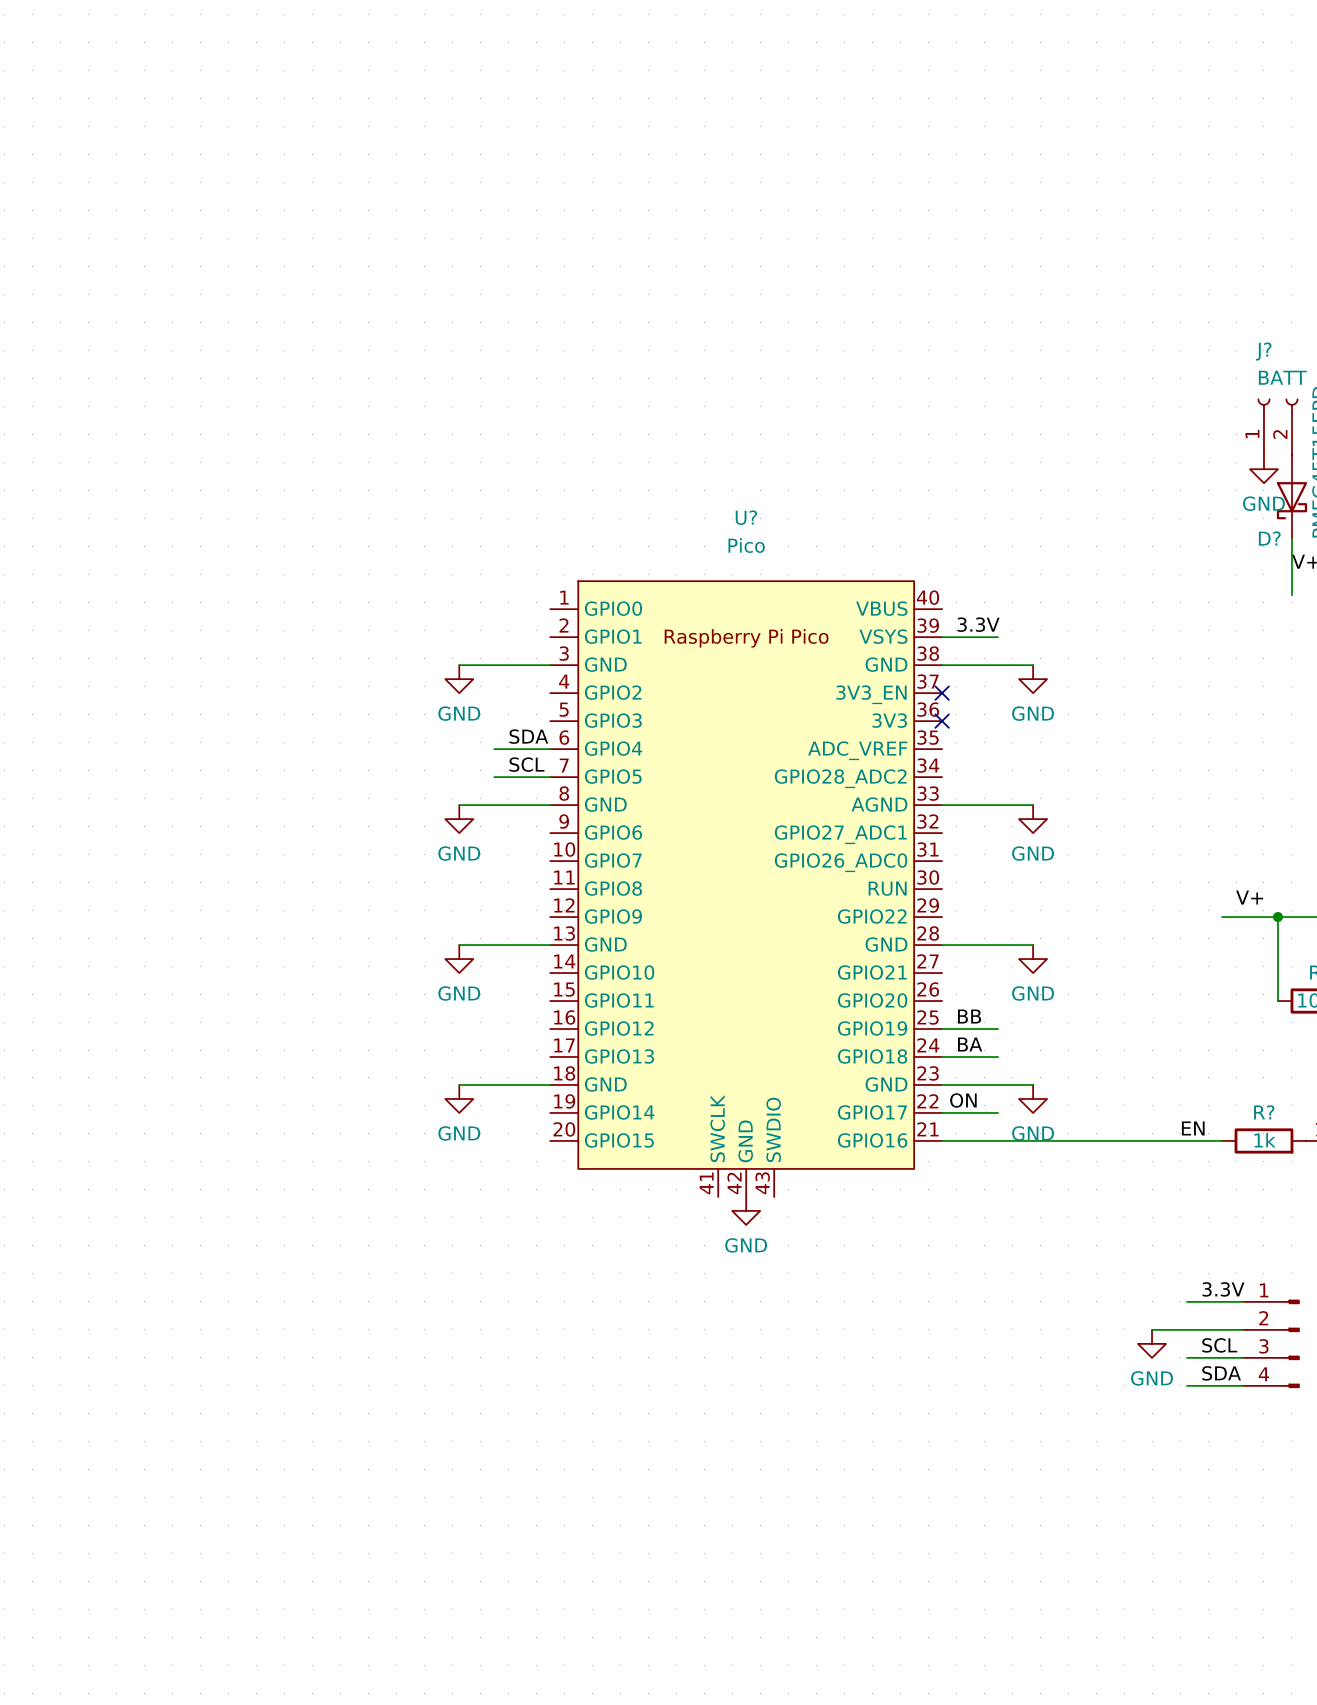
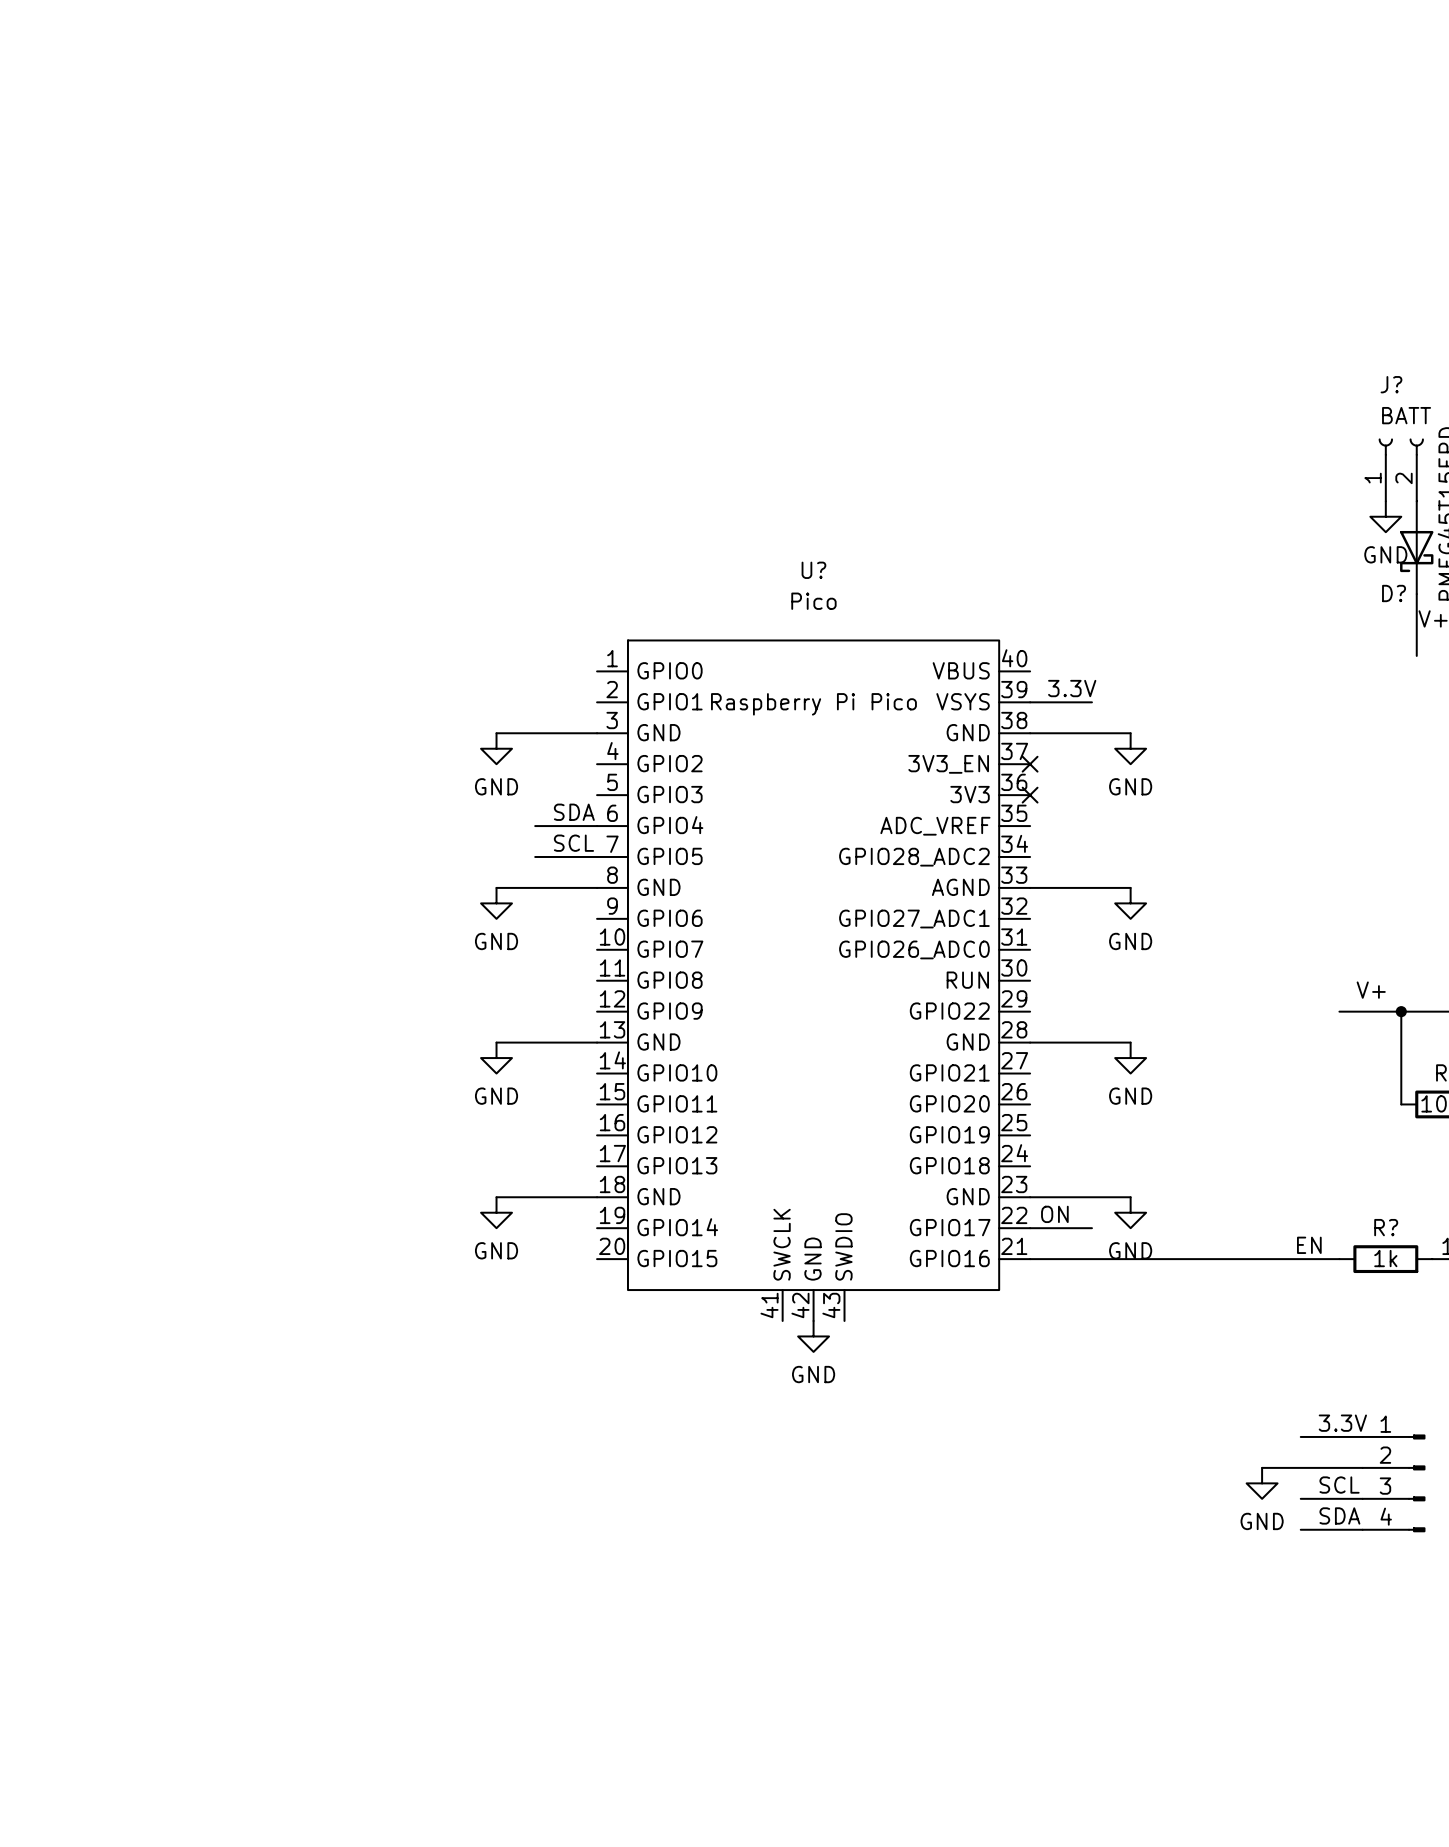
label: BB (969, 1016) -> none
wire: (942, 1029) (998, 1029) -> none
label: BA (970, 1044) -> none
wire: (942, 1056) (998, 1056) -> none

